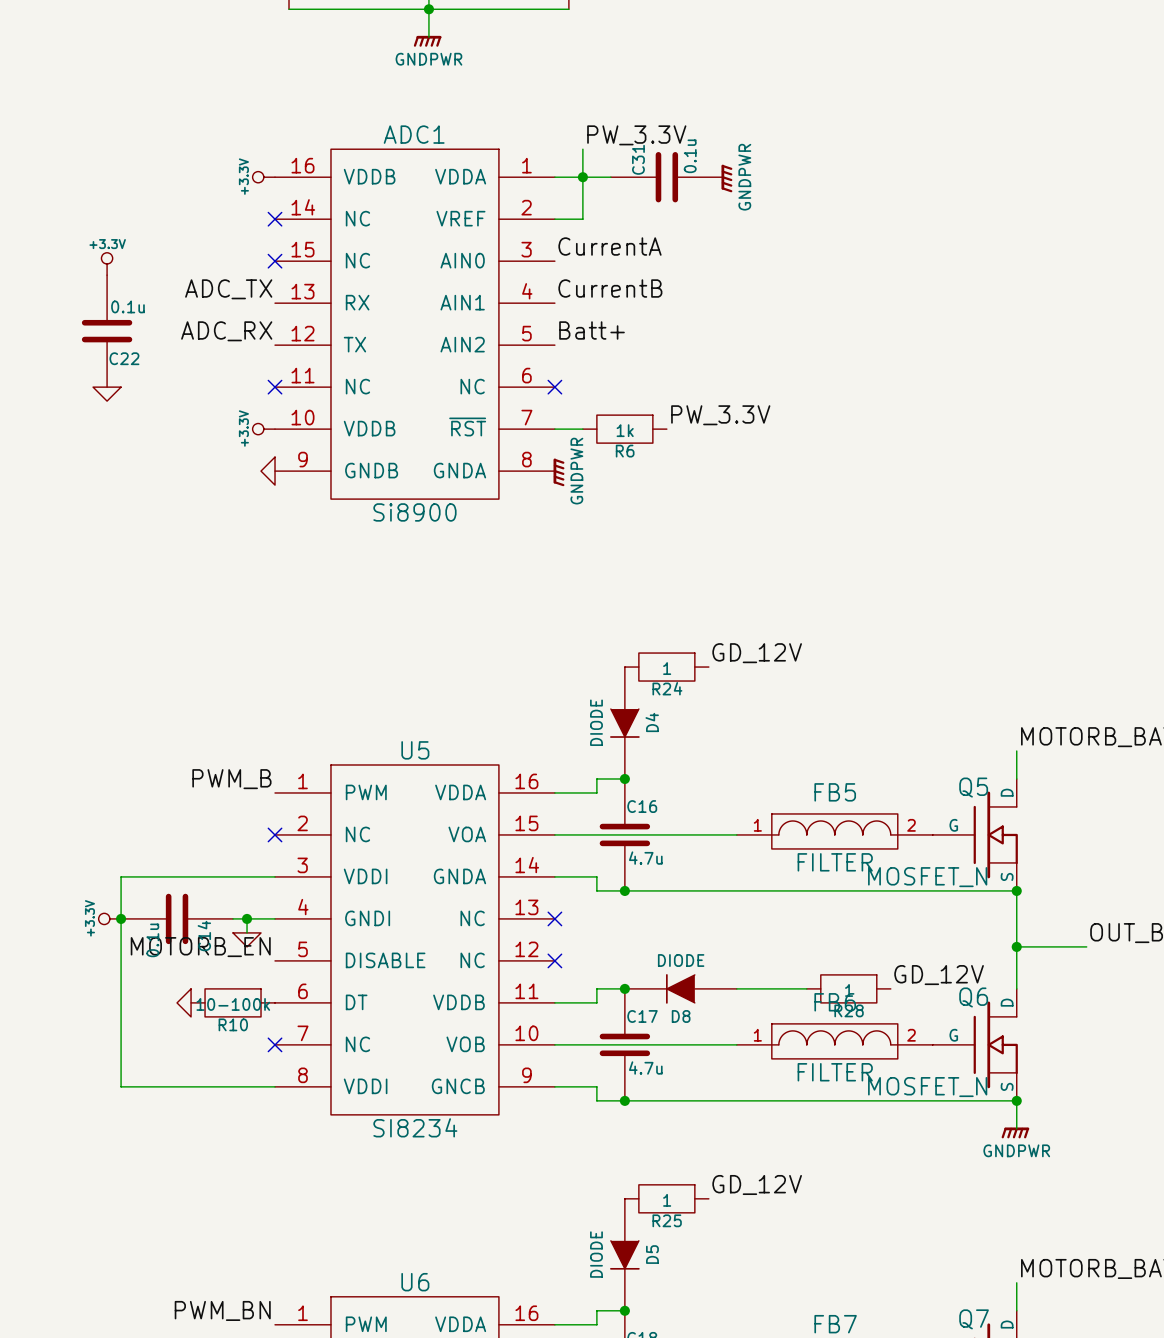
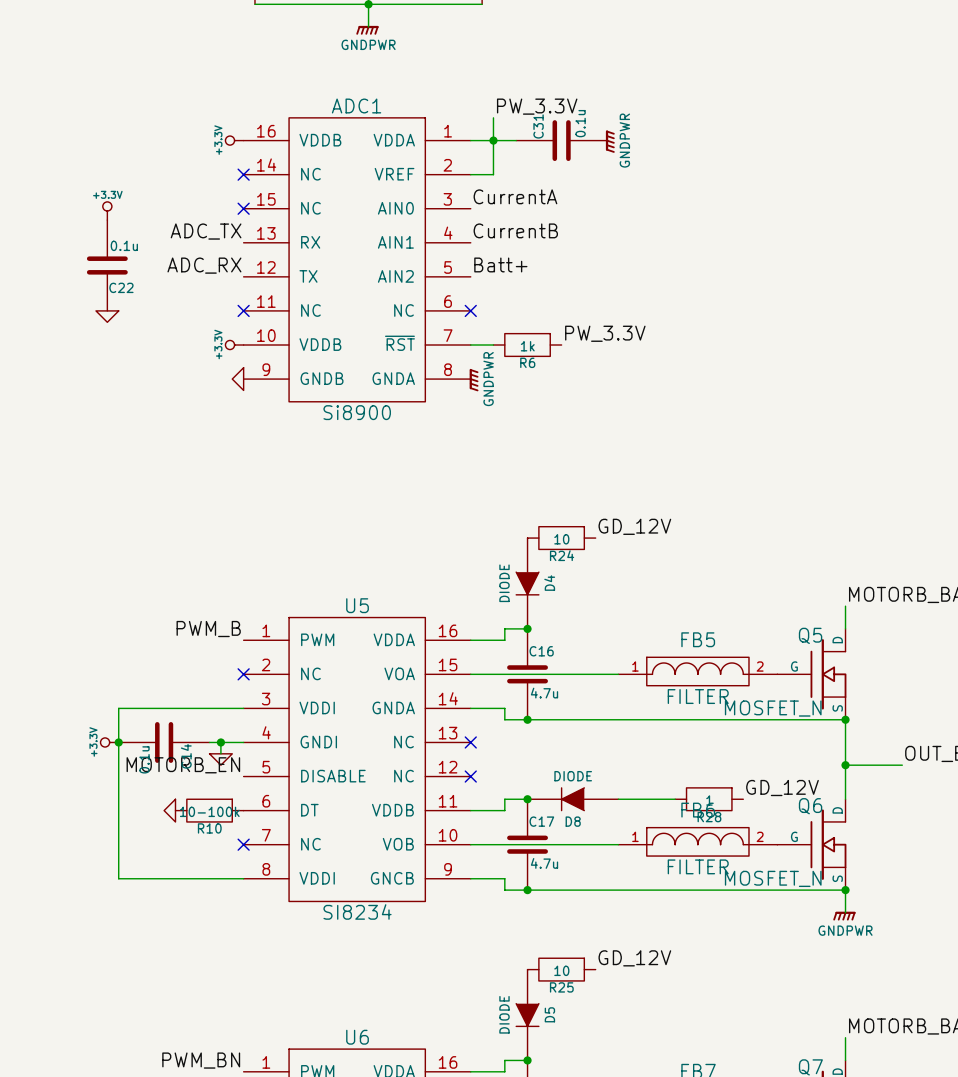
R24 value: 1 (667, 668) -> 10 (561, 539)
R25 value: 1 (667, 1200) -> 10 (561, 970)

